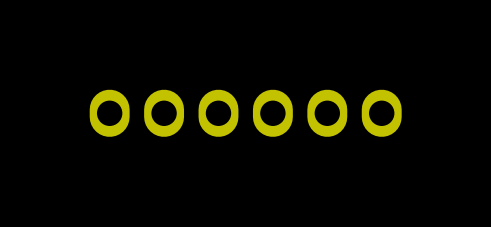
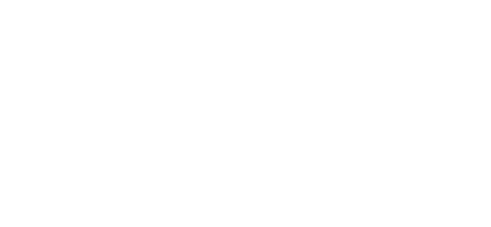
part: (245, 113) -> none

